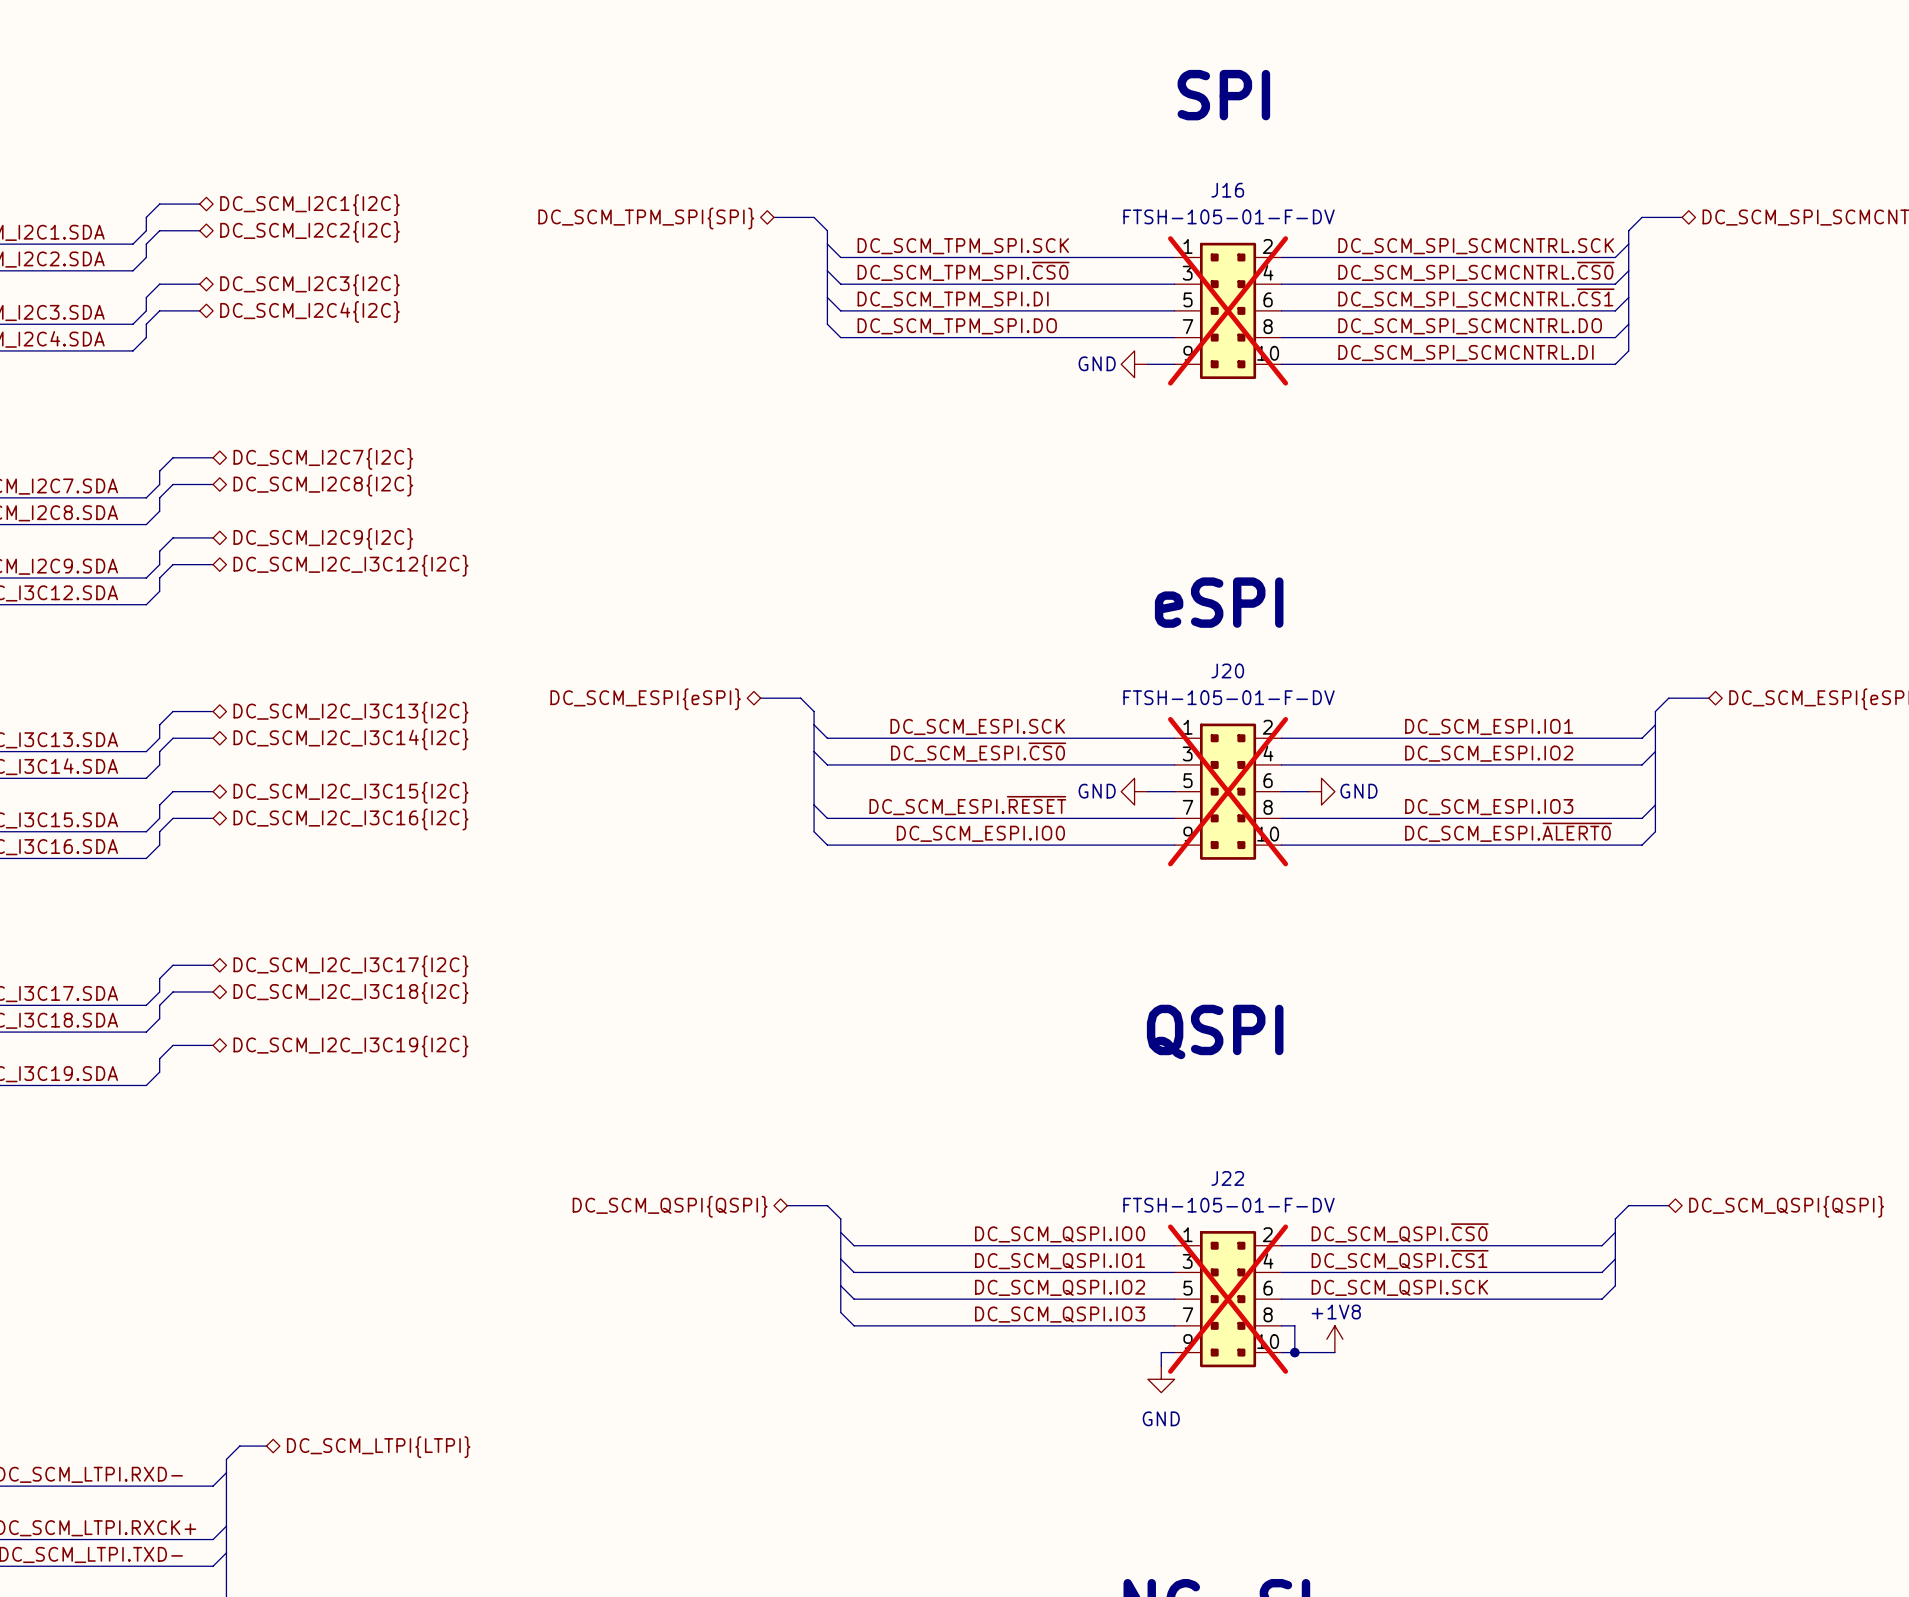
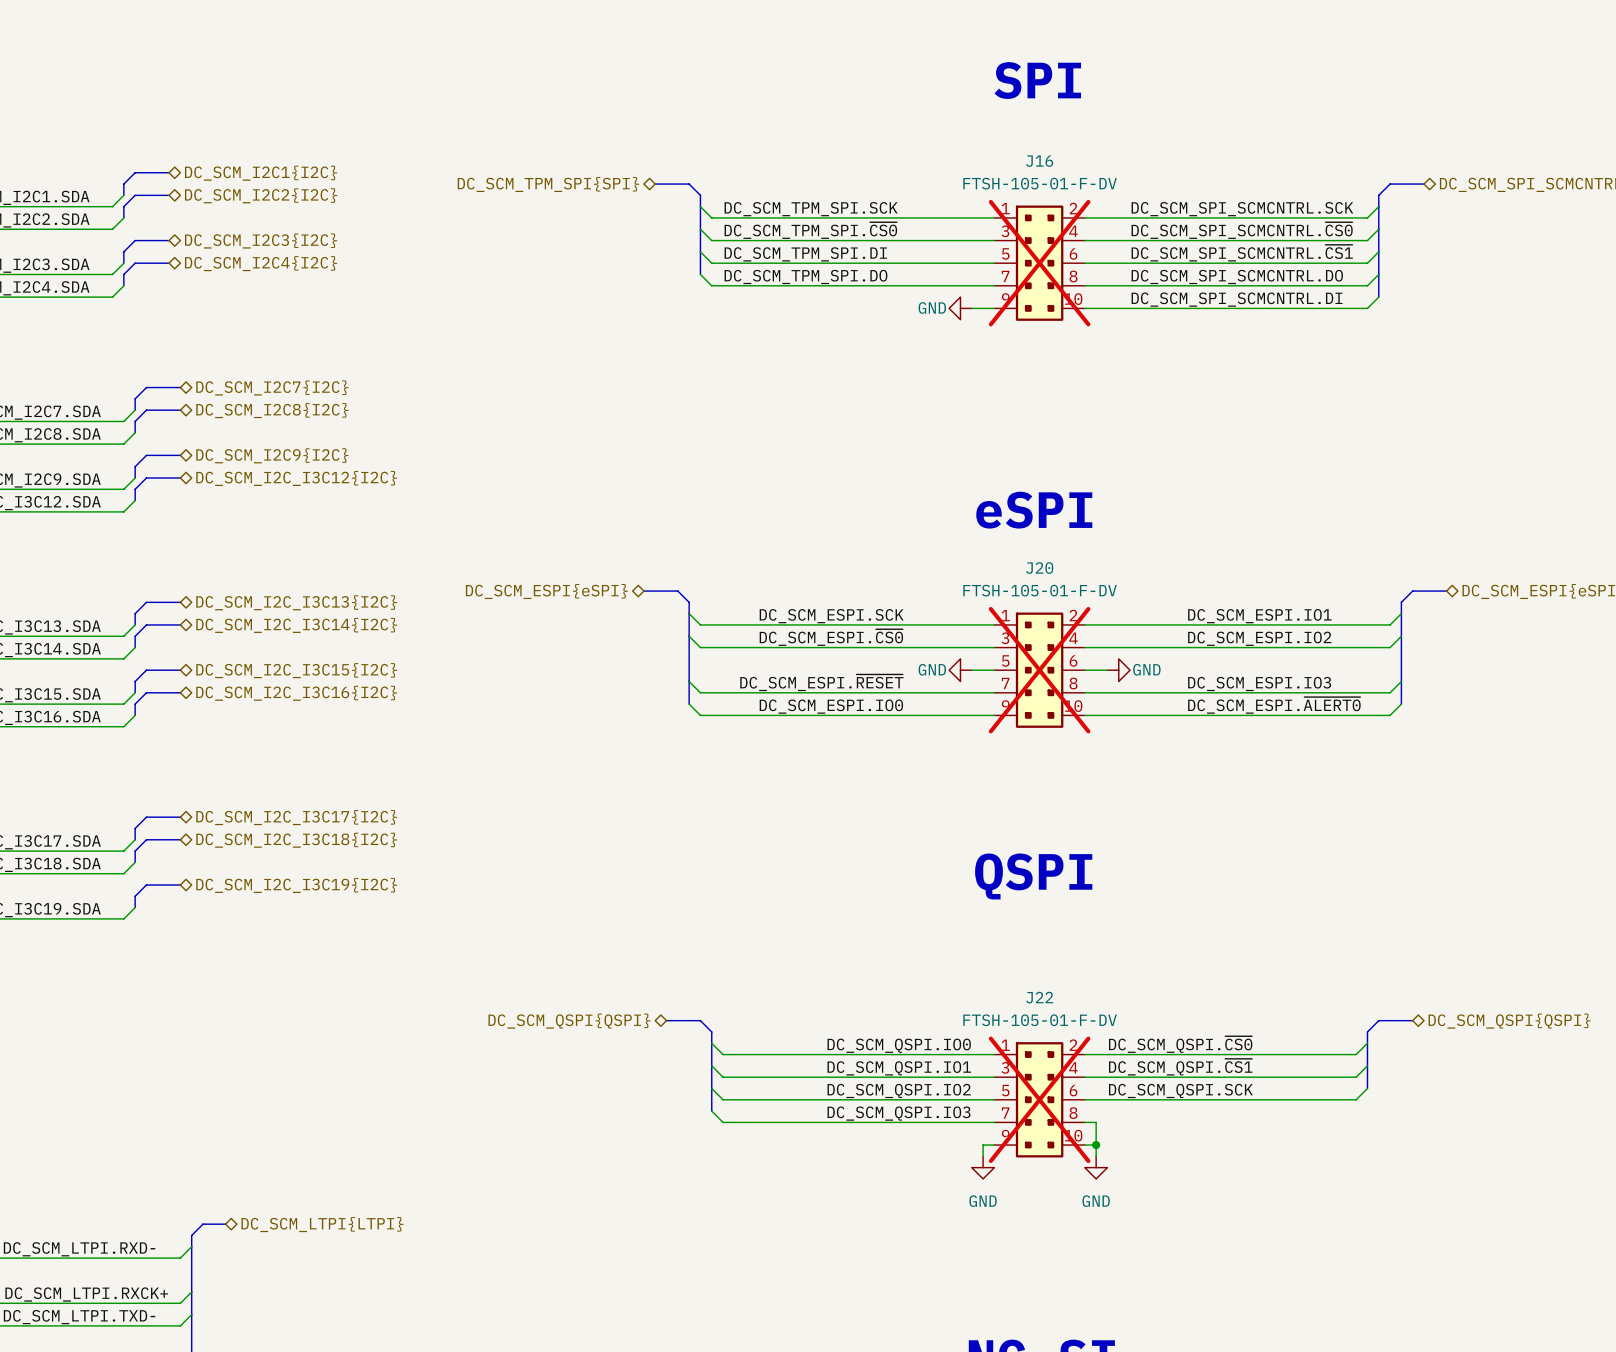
power symbol: +1V8 (1334, 1339) -> none
wire: (1294, 1352) (1334, 1352) -> (1096, 1145) (1096, 1156)
power symbol: none -> GND (1096, 1167)

